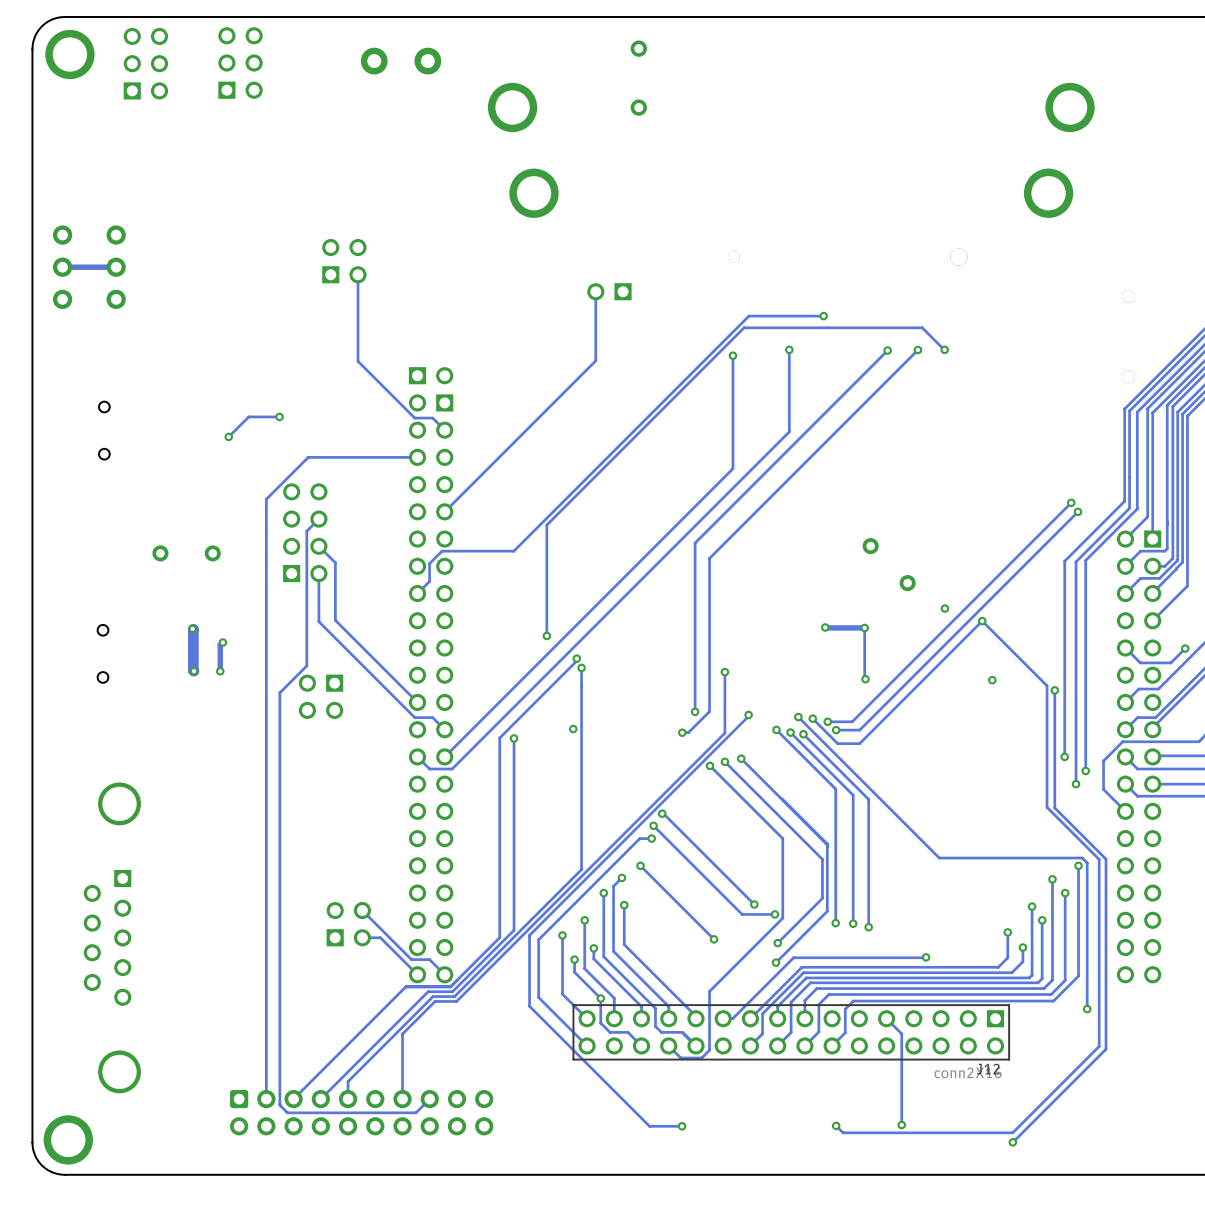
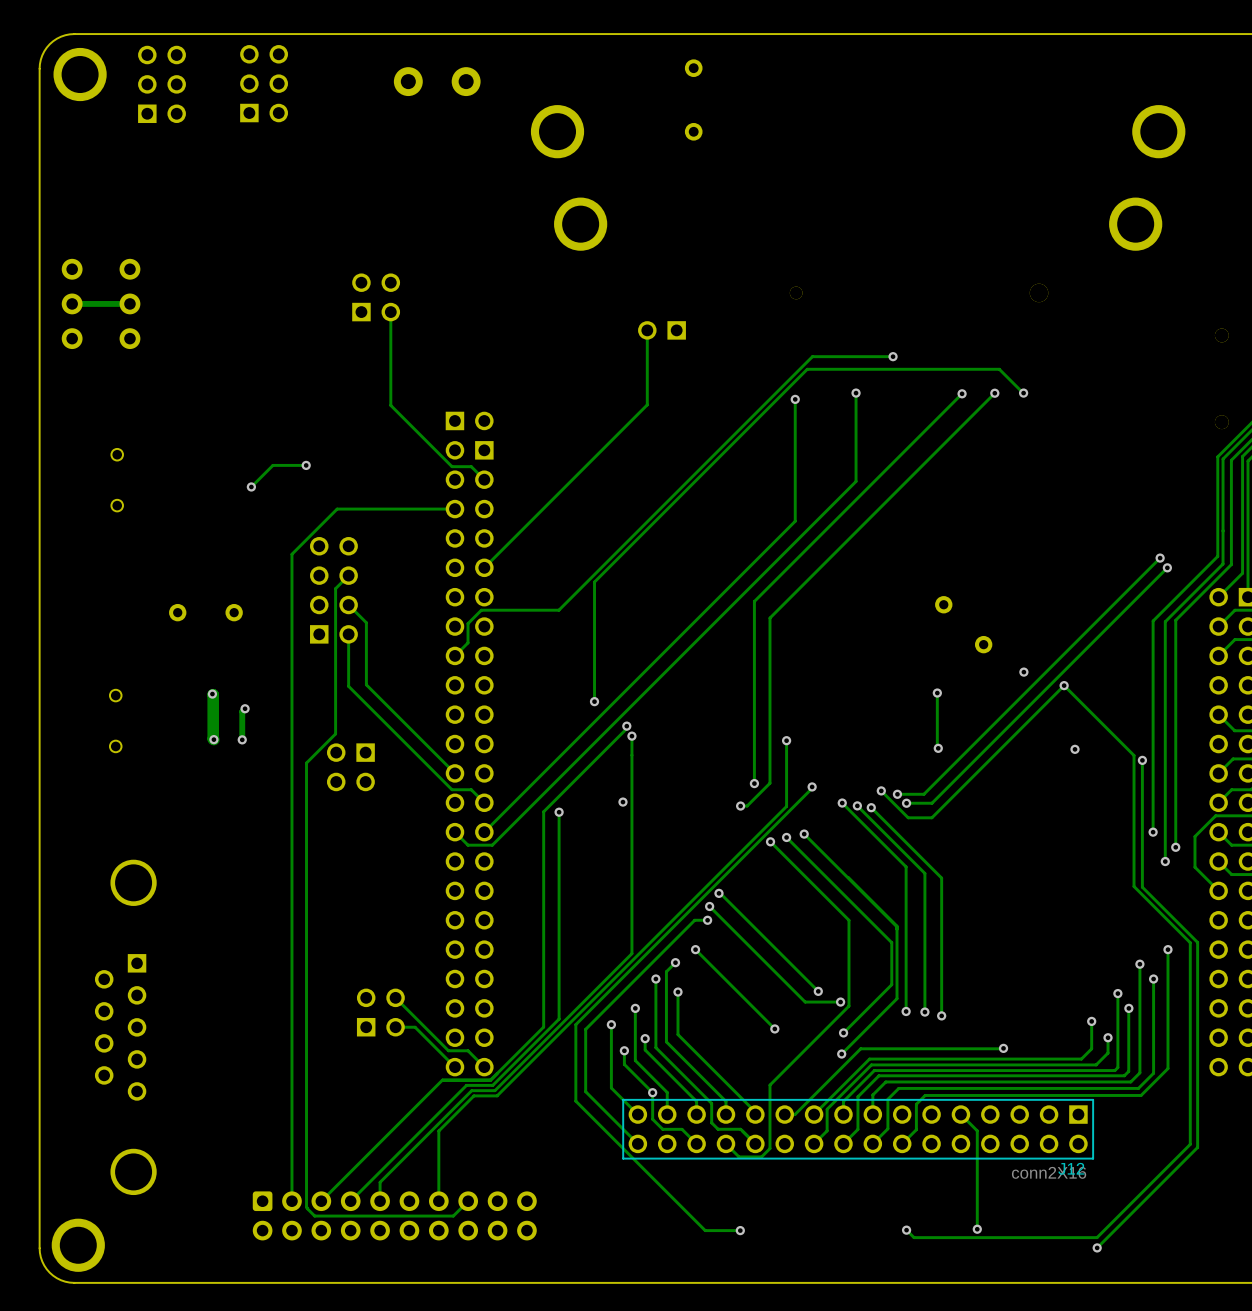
track: (825, 627) (864, 627) -> none
via: (825, 627) -> none
track: (798, 717) (939, 858) (1082, 858) (1087, 862) (1087, 1009) -> none
via: (798, 717) -> none
via: (1087, 1009) -> none

